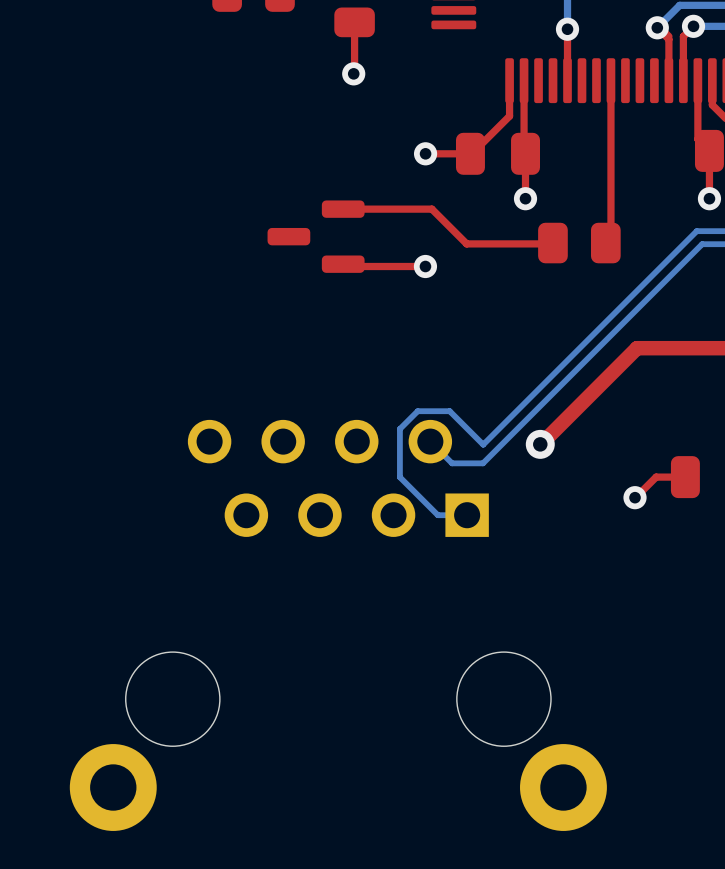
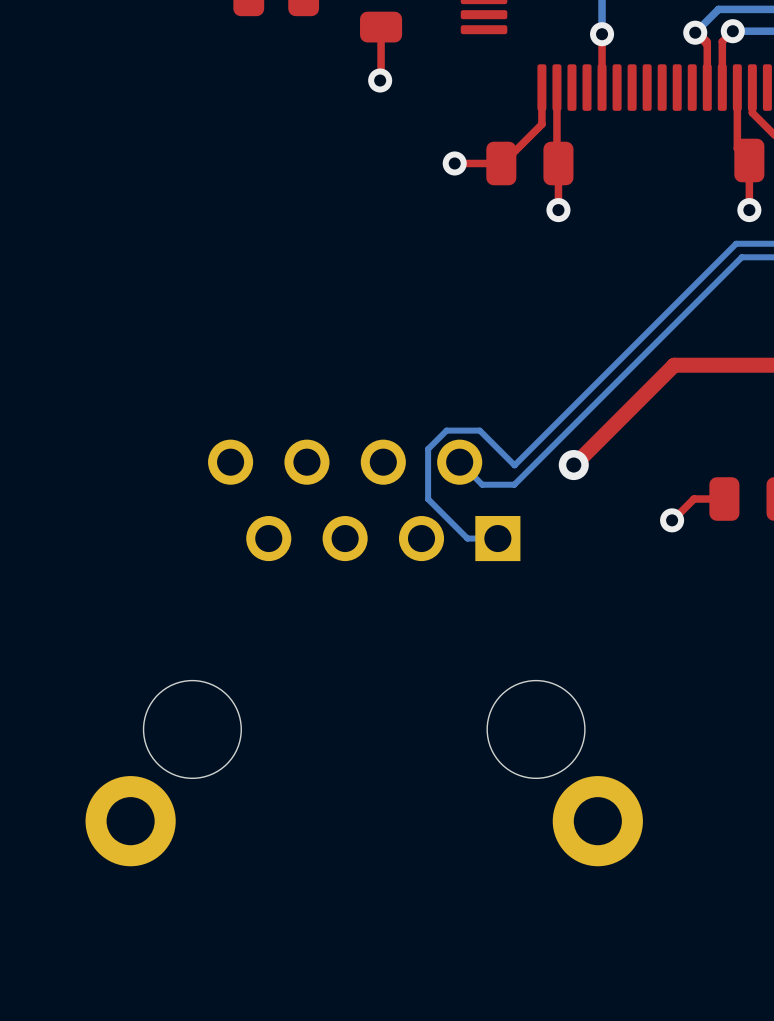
top track: (610, 80) (610, 237) (605, 243) -> none
top track: (343, 209) (431, 209) (466, 243) (553, 243) -> none
part: (316, 236) -> none
part: (579, 243) -> none
top track: (425, 266) (344, 266) -> none
via: (425, 266) -> none

